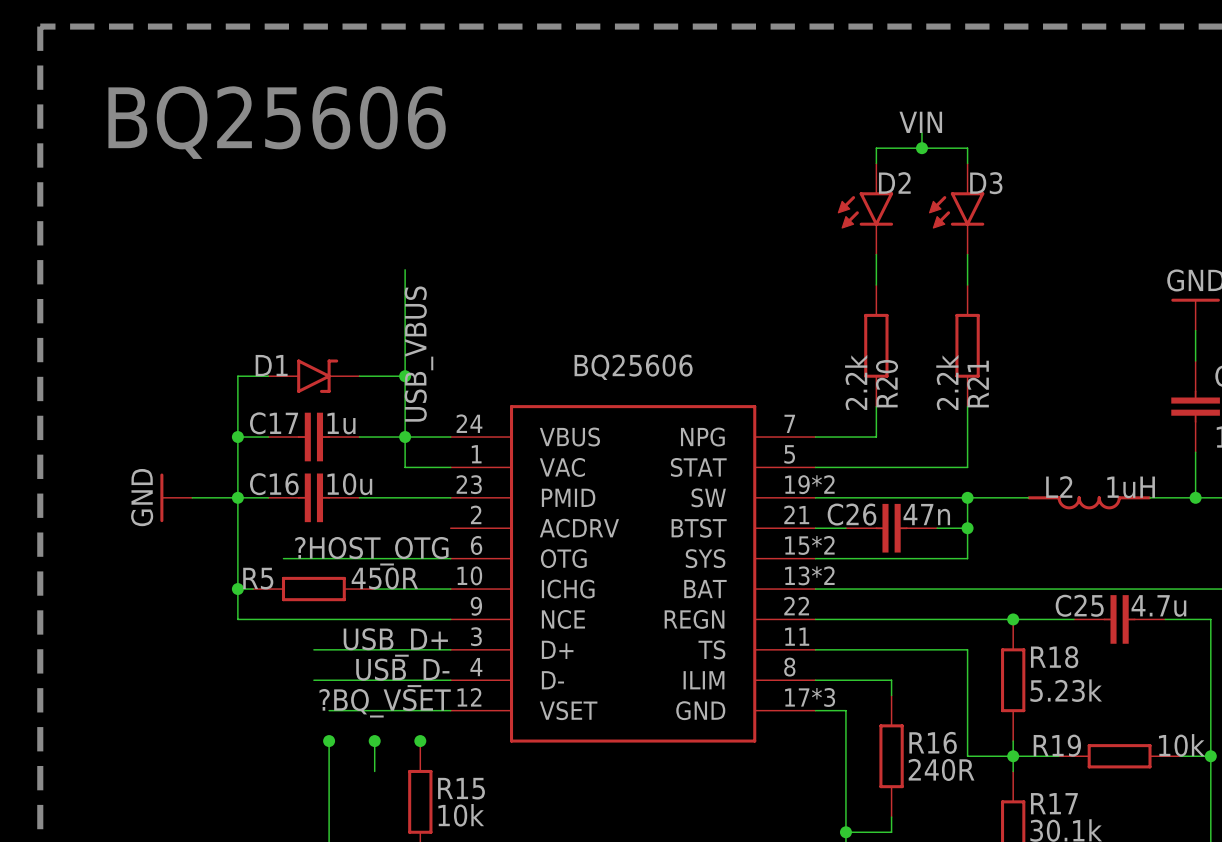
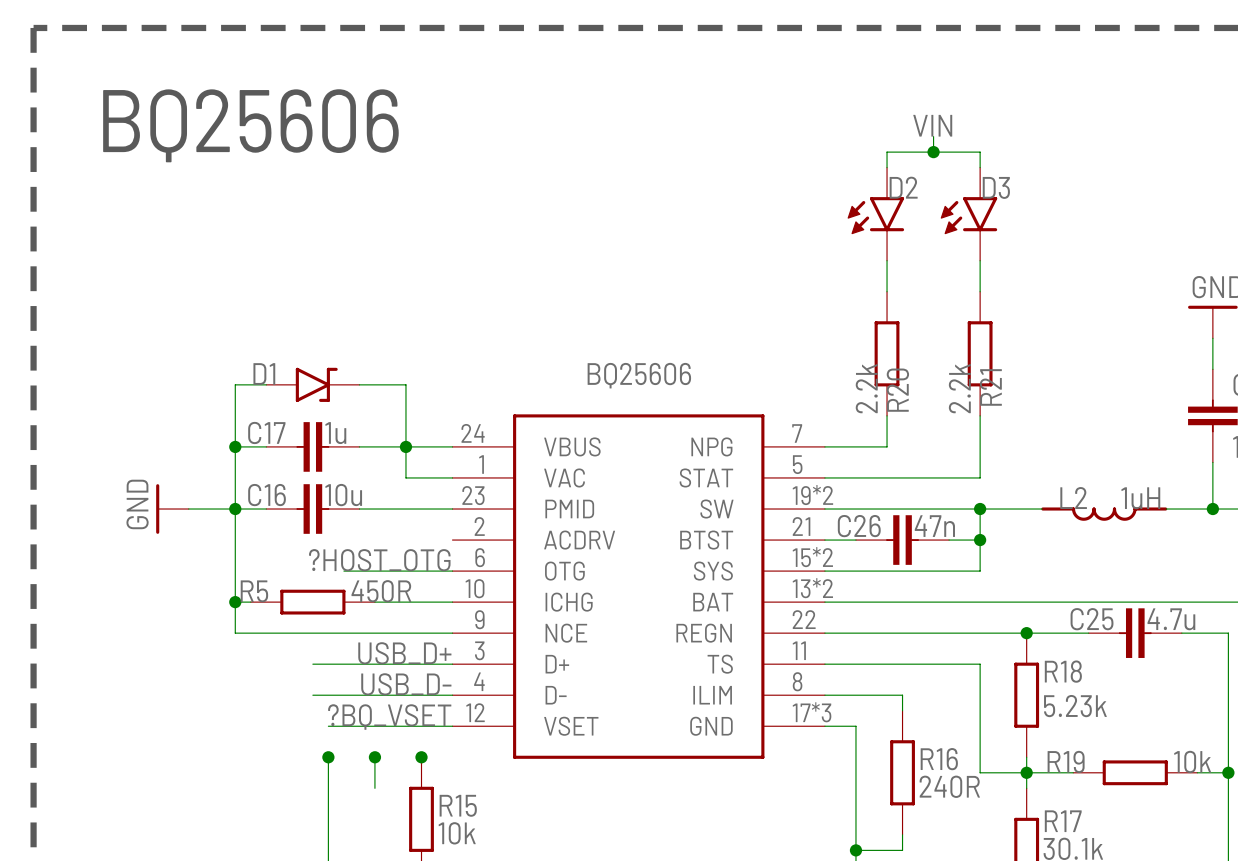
wire: (405, 269) (405, 376) -> none
label: USB_VBUS (419, 354) -> none
junction: (405, 376) -> none
wire: (283, 558) (344, 558) -> none

